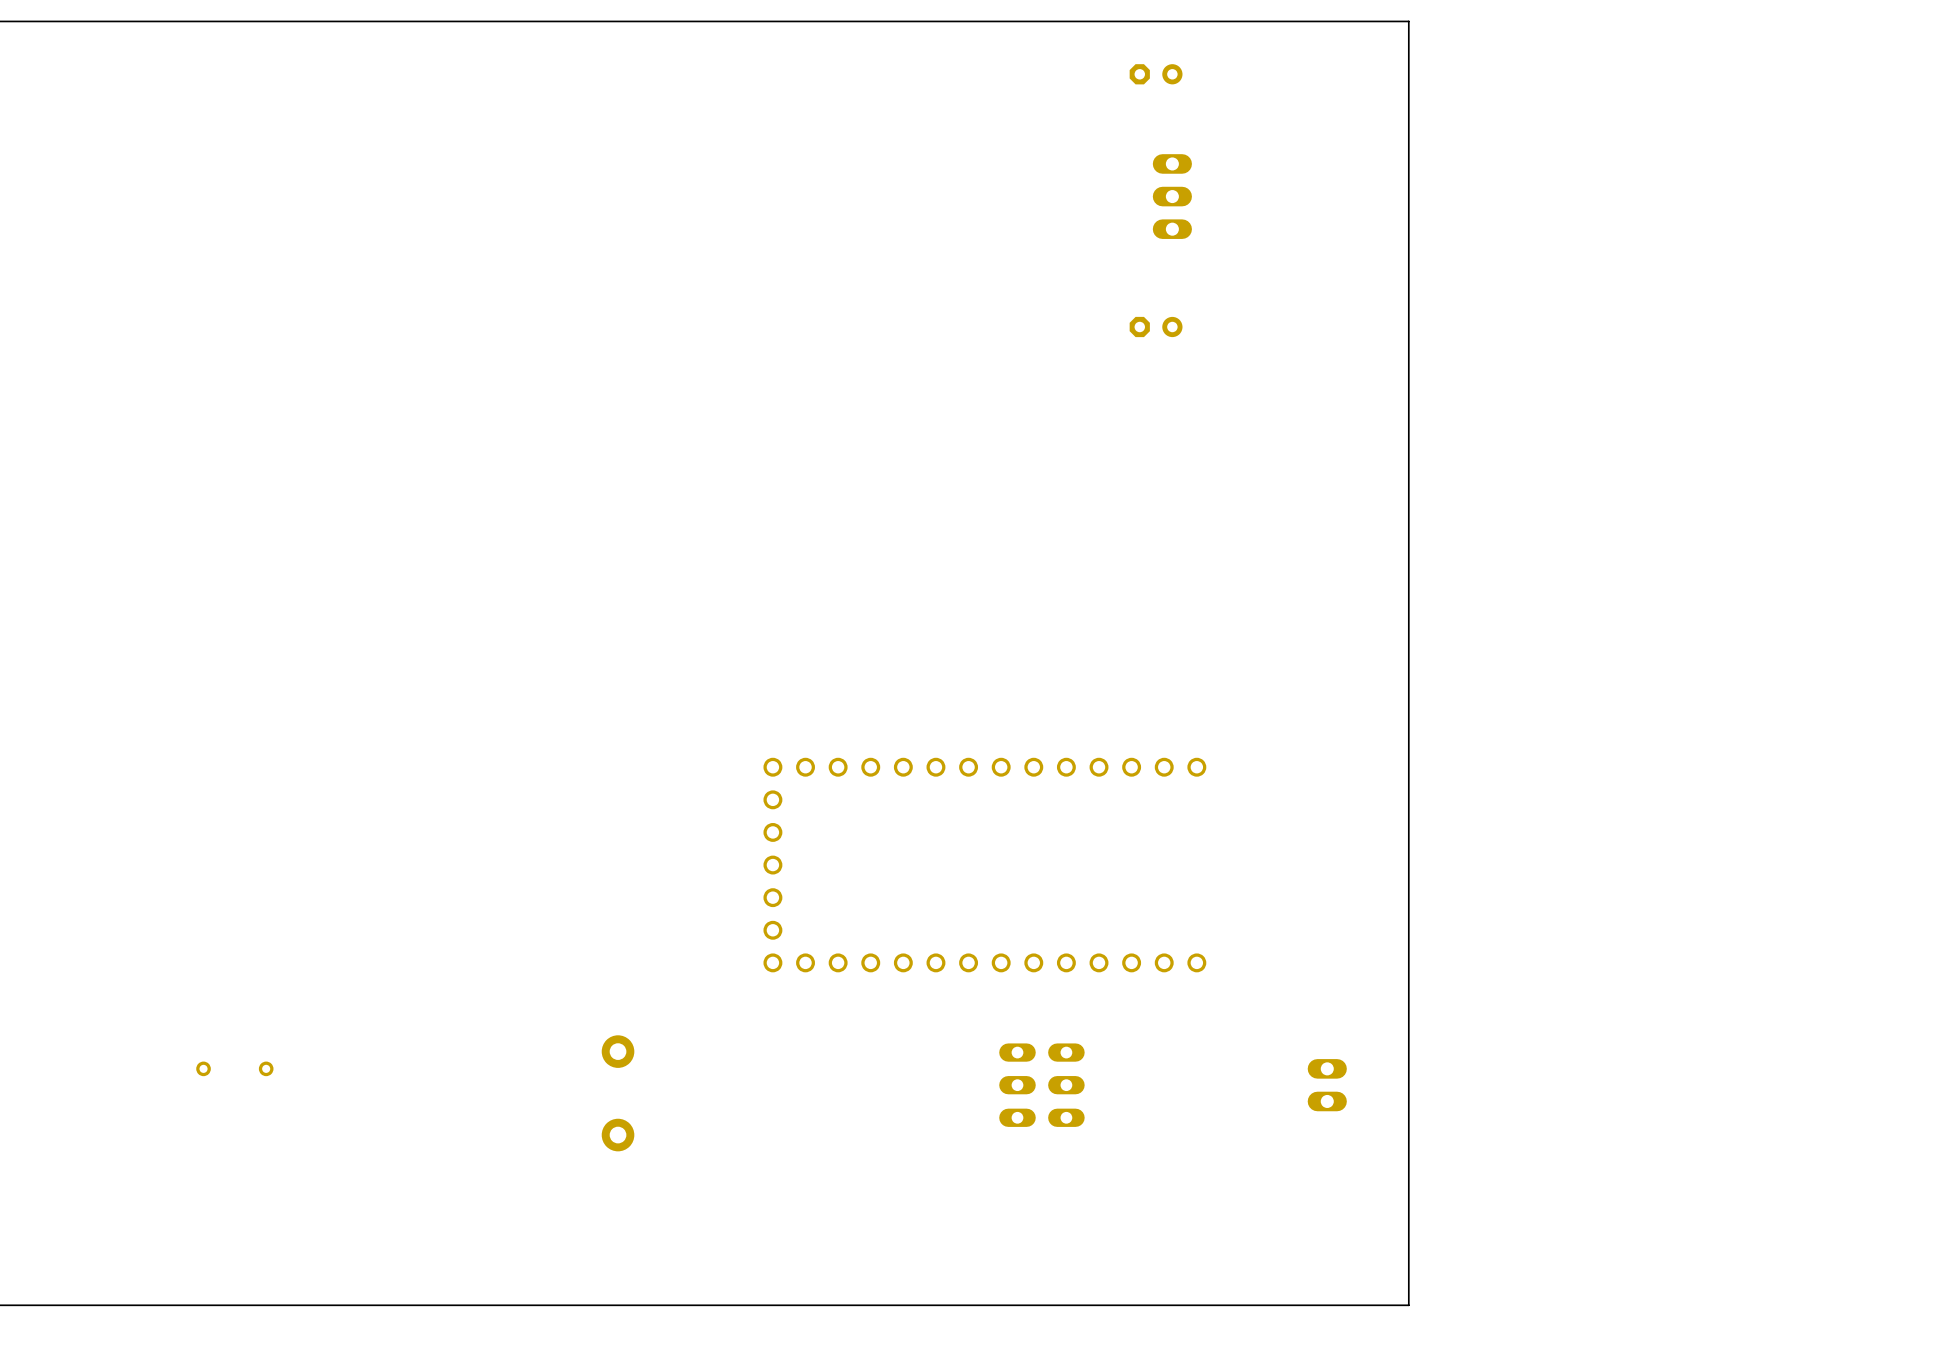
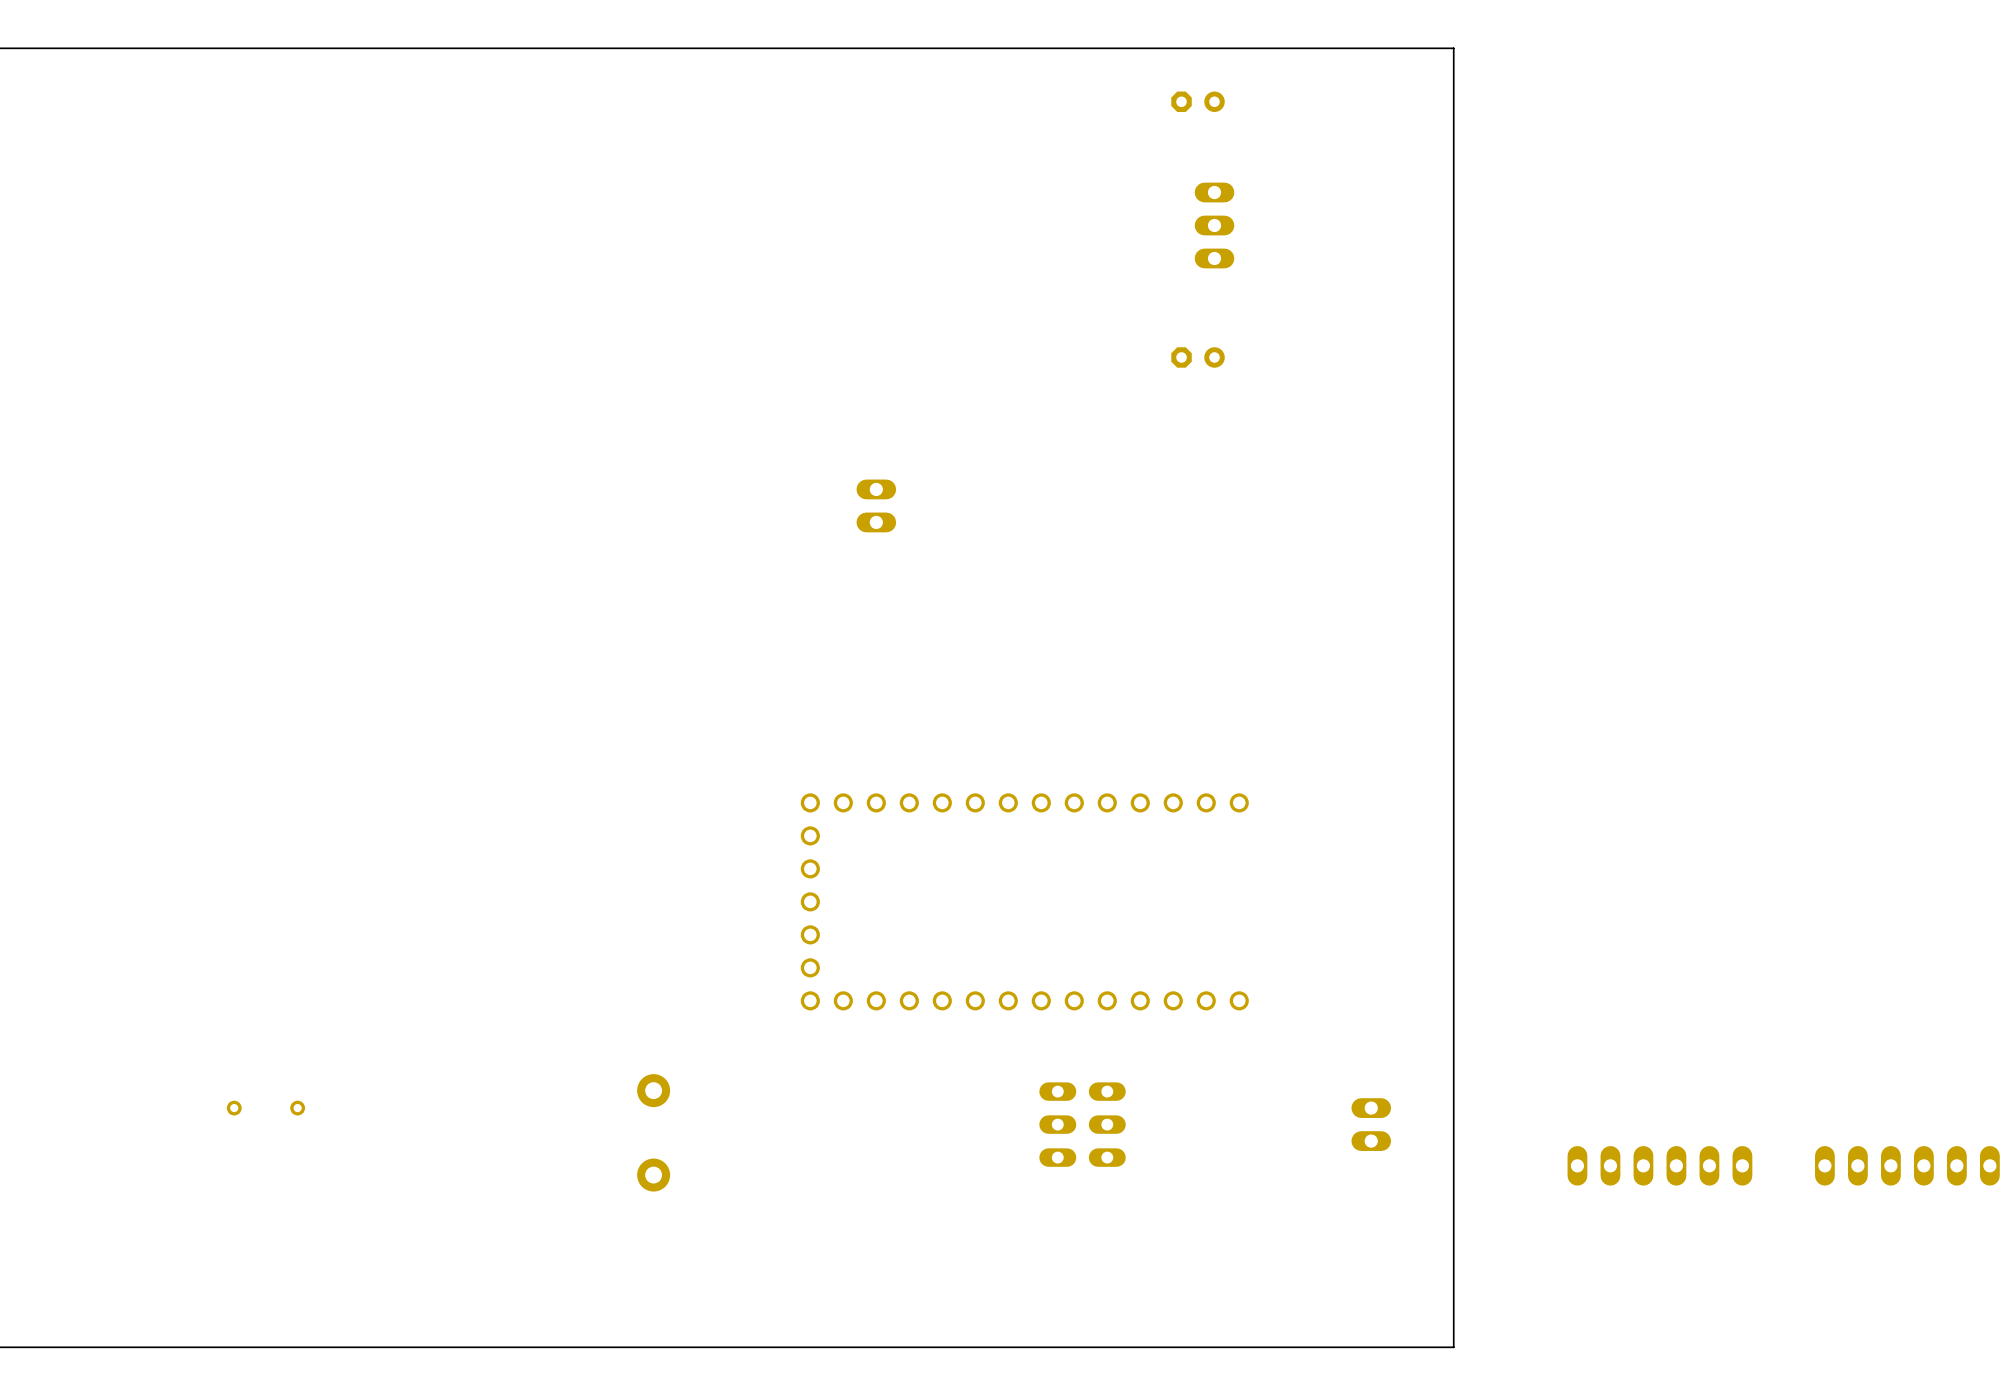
part: none -> (876, 505)
part: none -> (1659, 1165)
part: none -> (1907, 1165)

